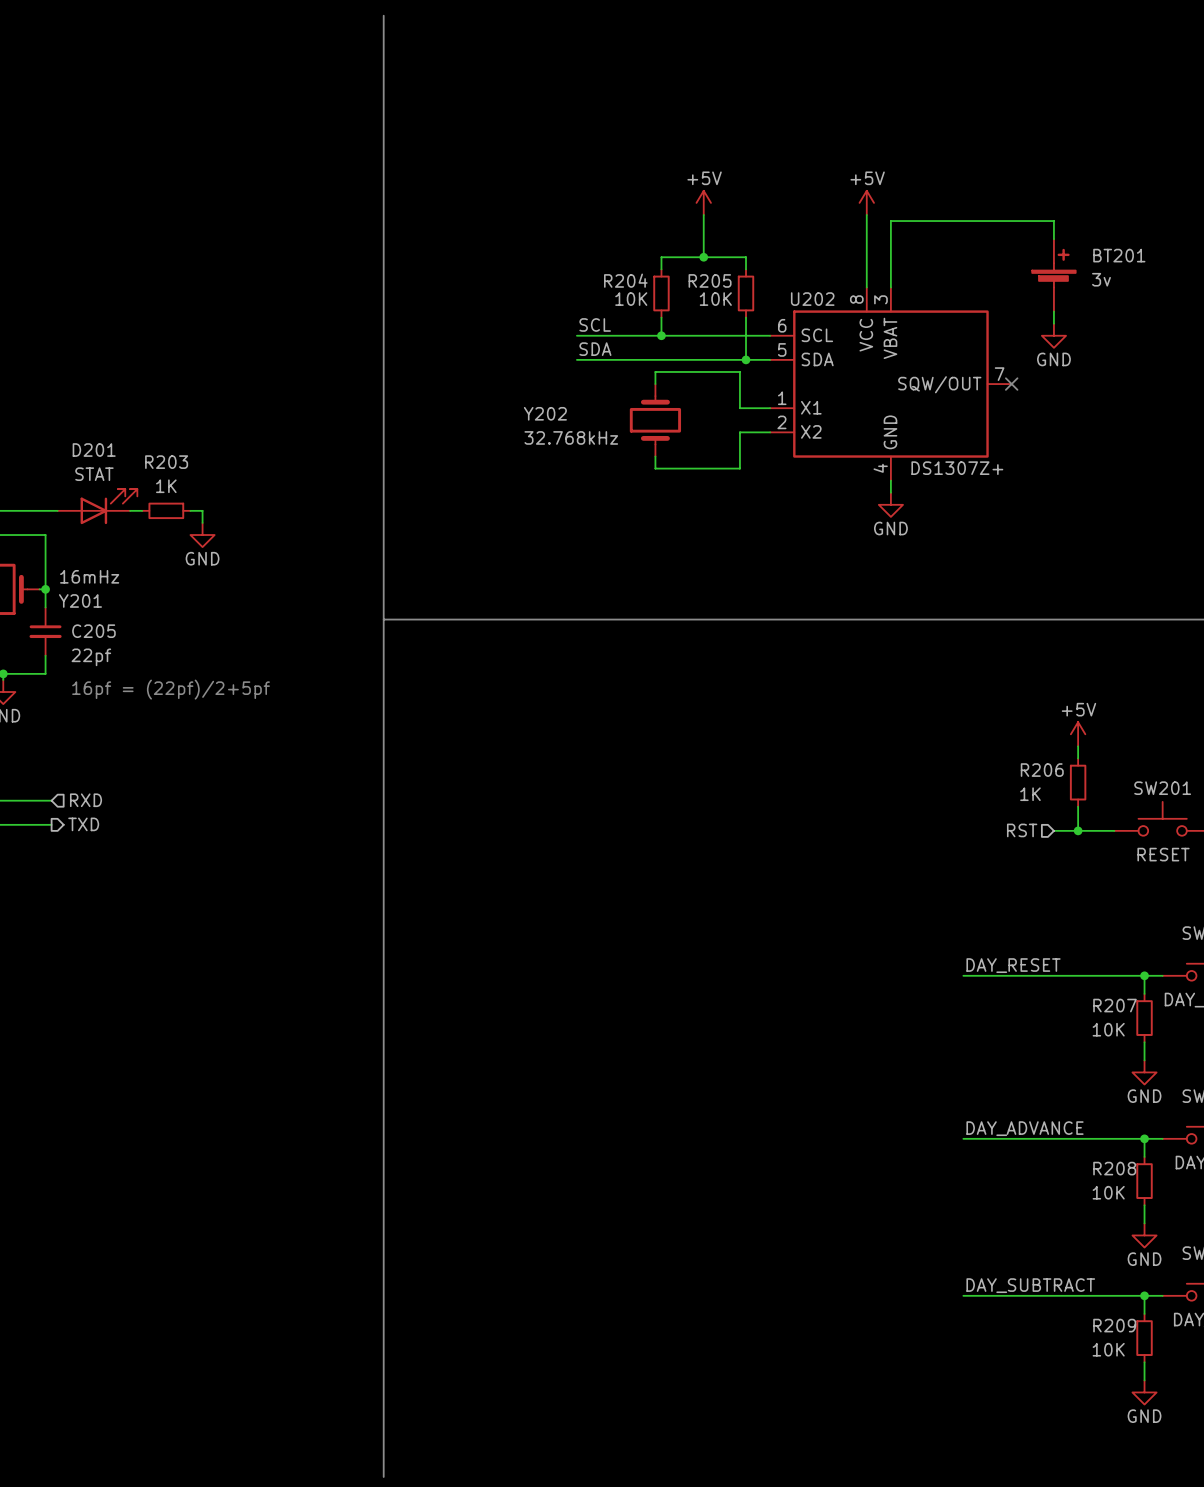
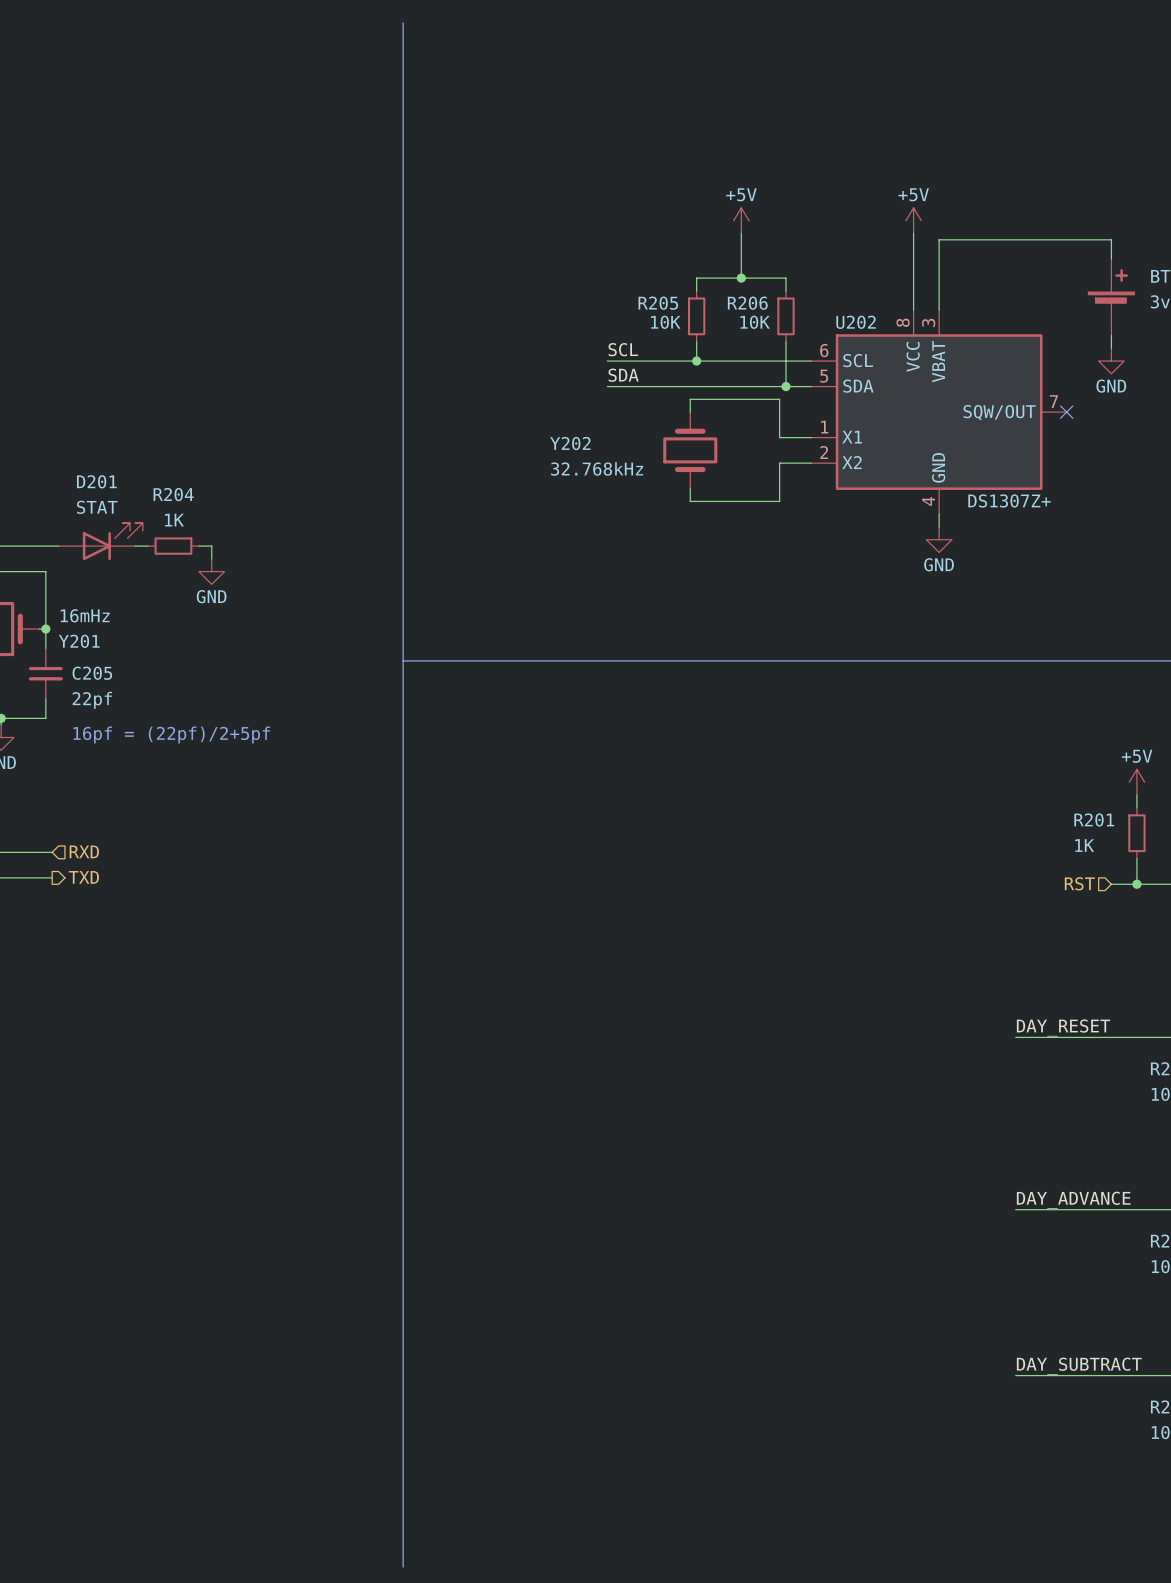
R204 name: R204 (625, 280) -> R205 (658, 303)
R205 name: R205 (710, 280) -> R206 (747, 303)
R203 name: R203 (166, 462) -> R204 (173, 494)
R206 name: R206 (1042, 770) -> R201 (1094, 819)

